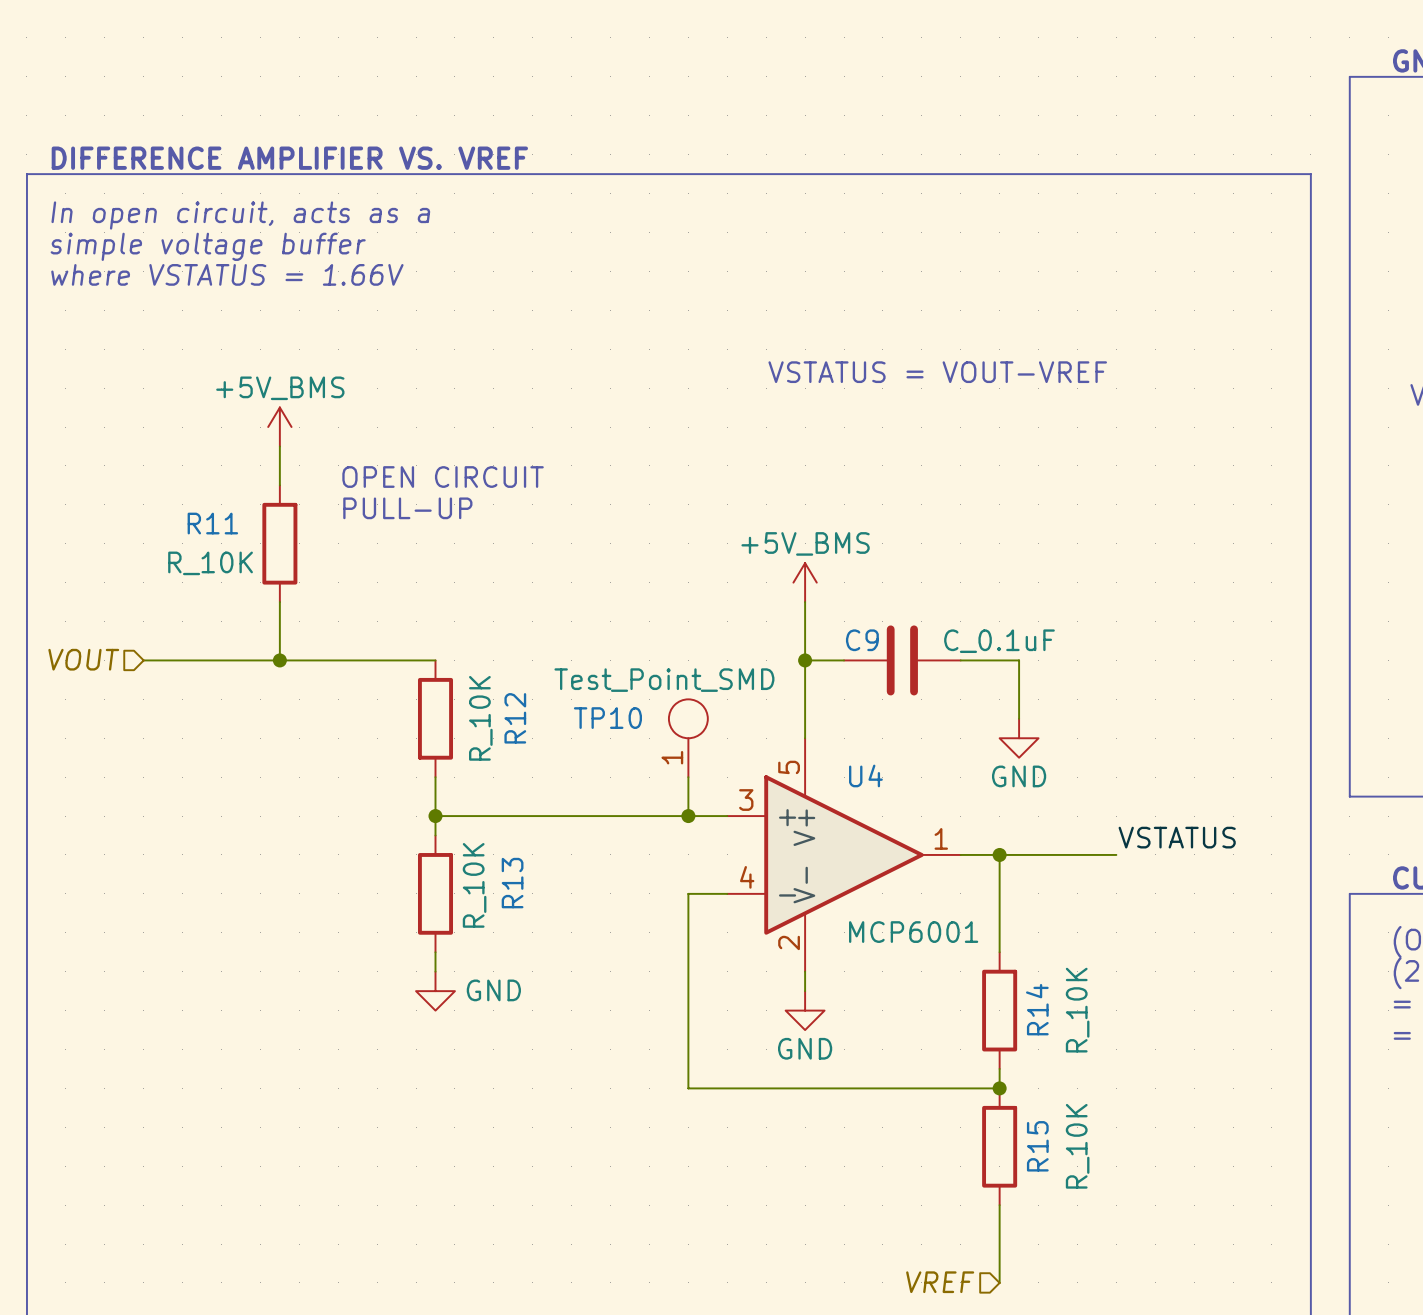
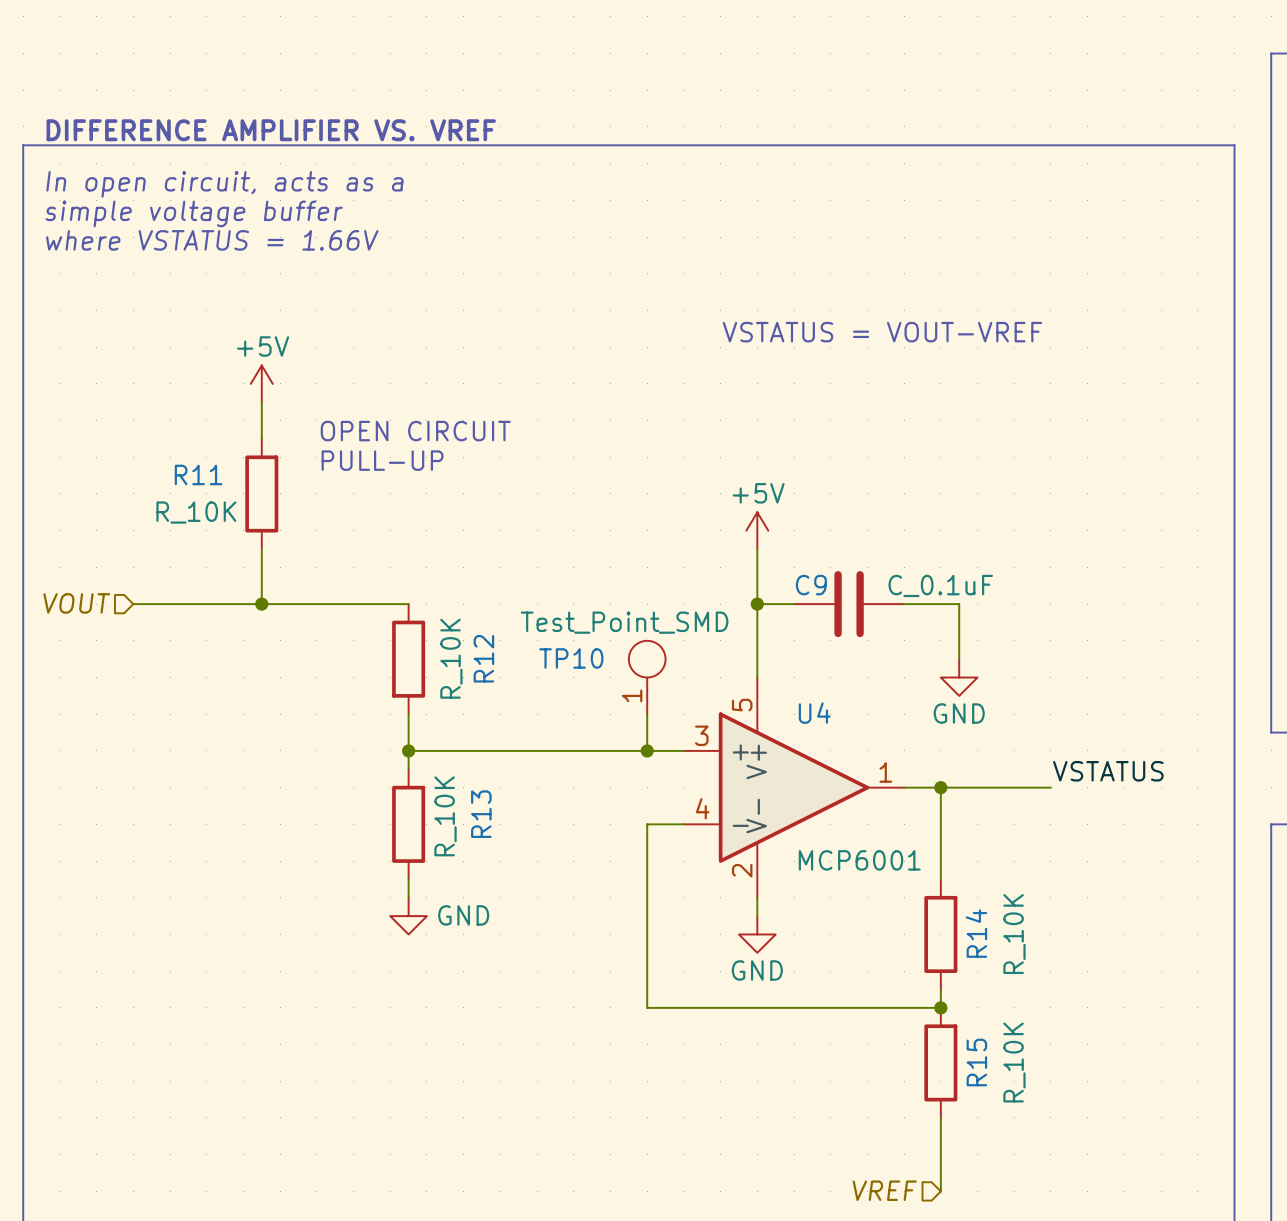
power symbol: +5V_BMS (279, 427) -> +5V (261, 383)
power symbol: +5V_BMS (805, 582) -> +5V (757, 530)

